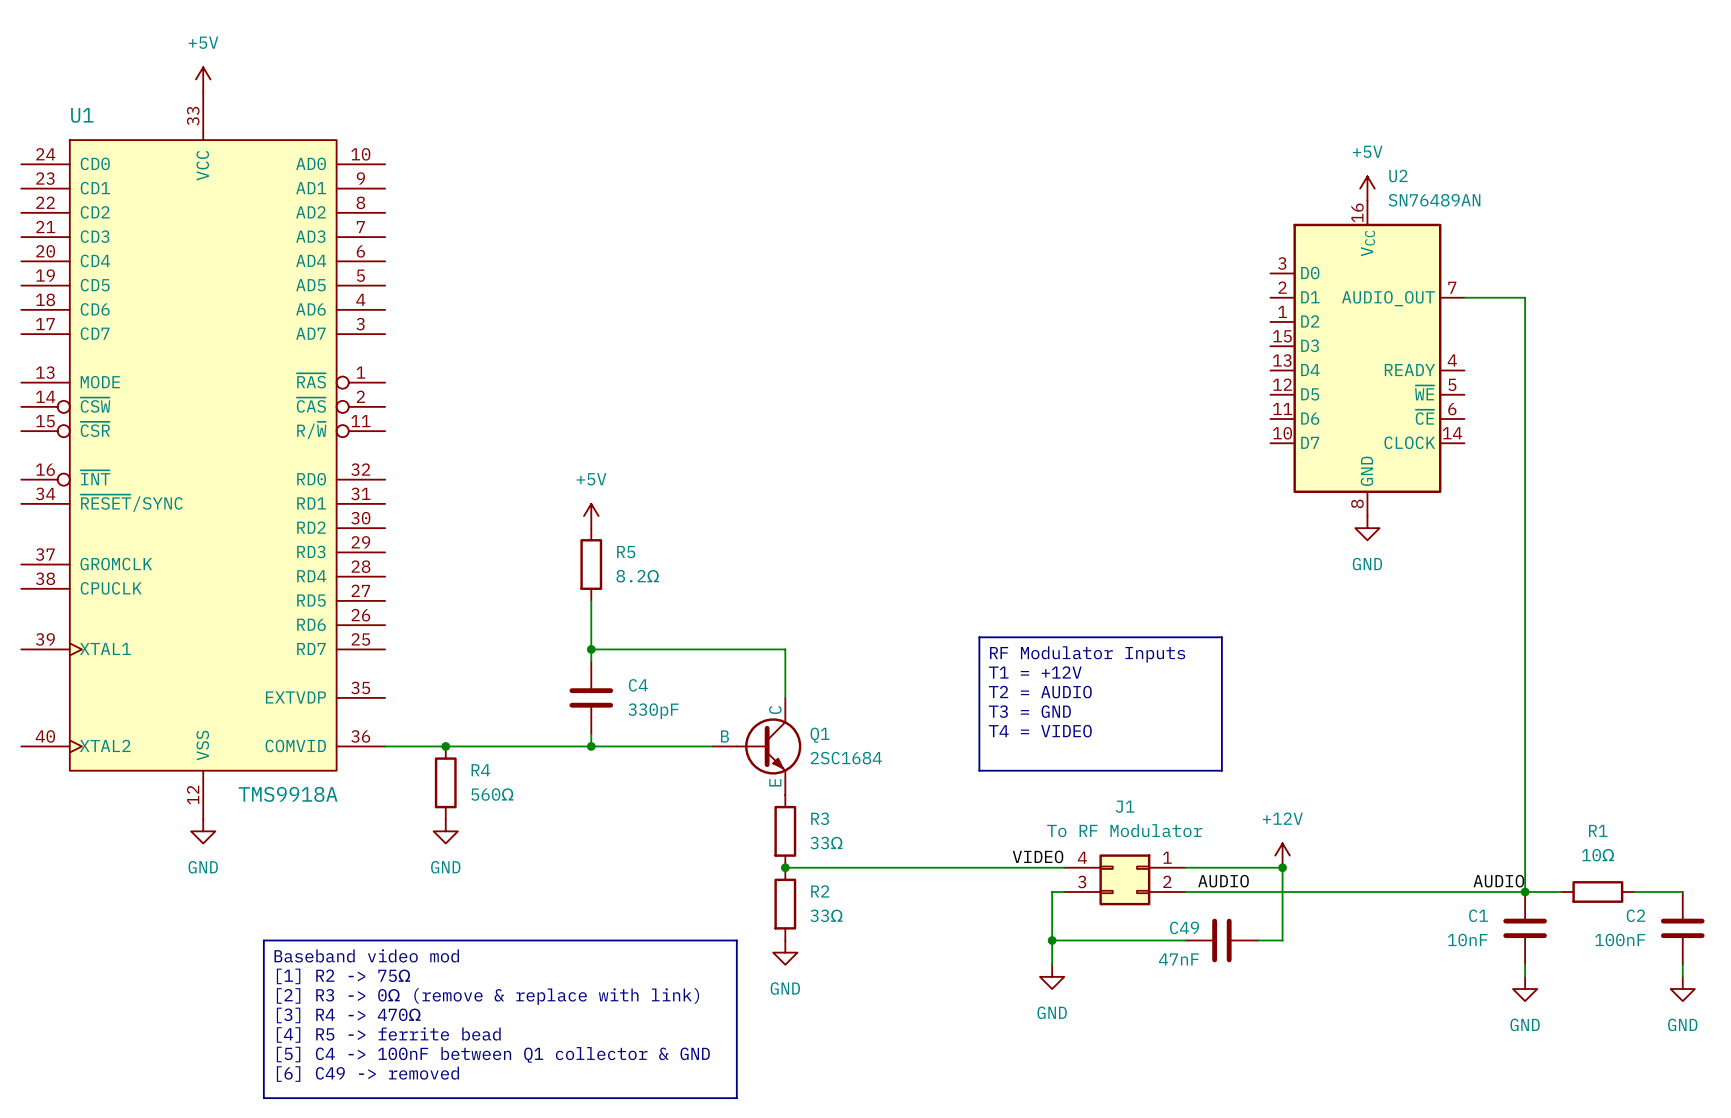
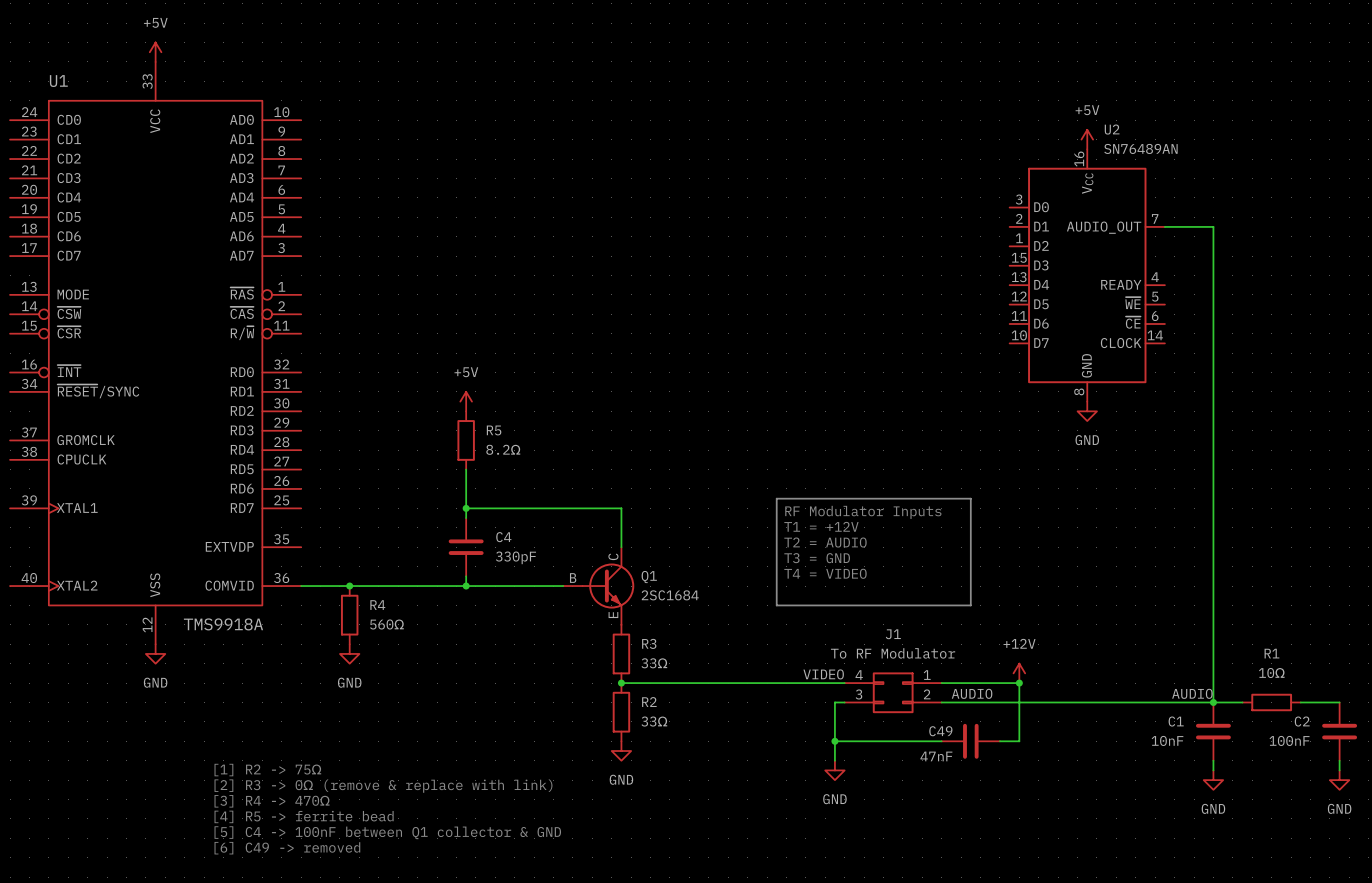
line: (263, 940) (736, 940) (736, 1098) (263, 1098) (263, 940) -> none
text: Baseband video mod (366, 955) -> none

